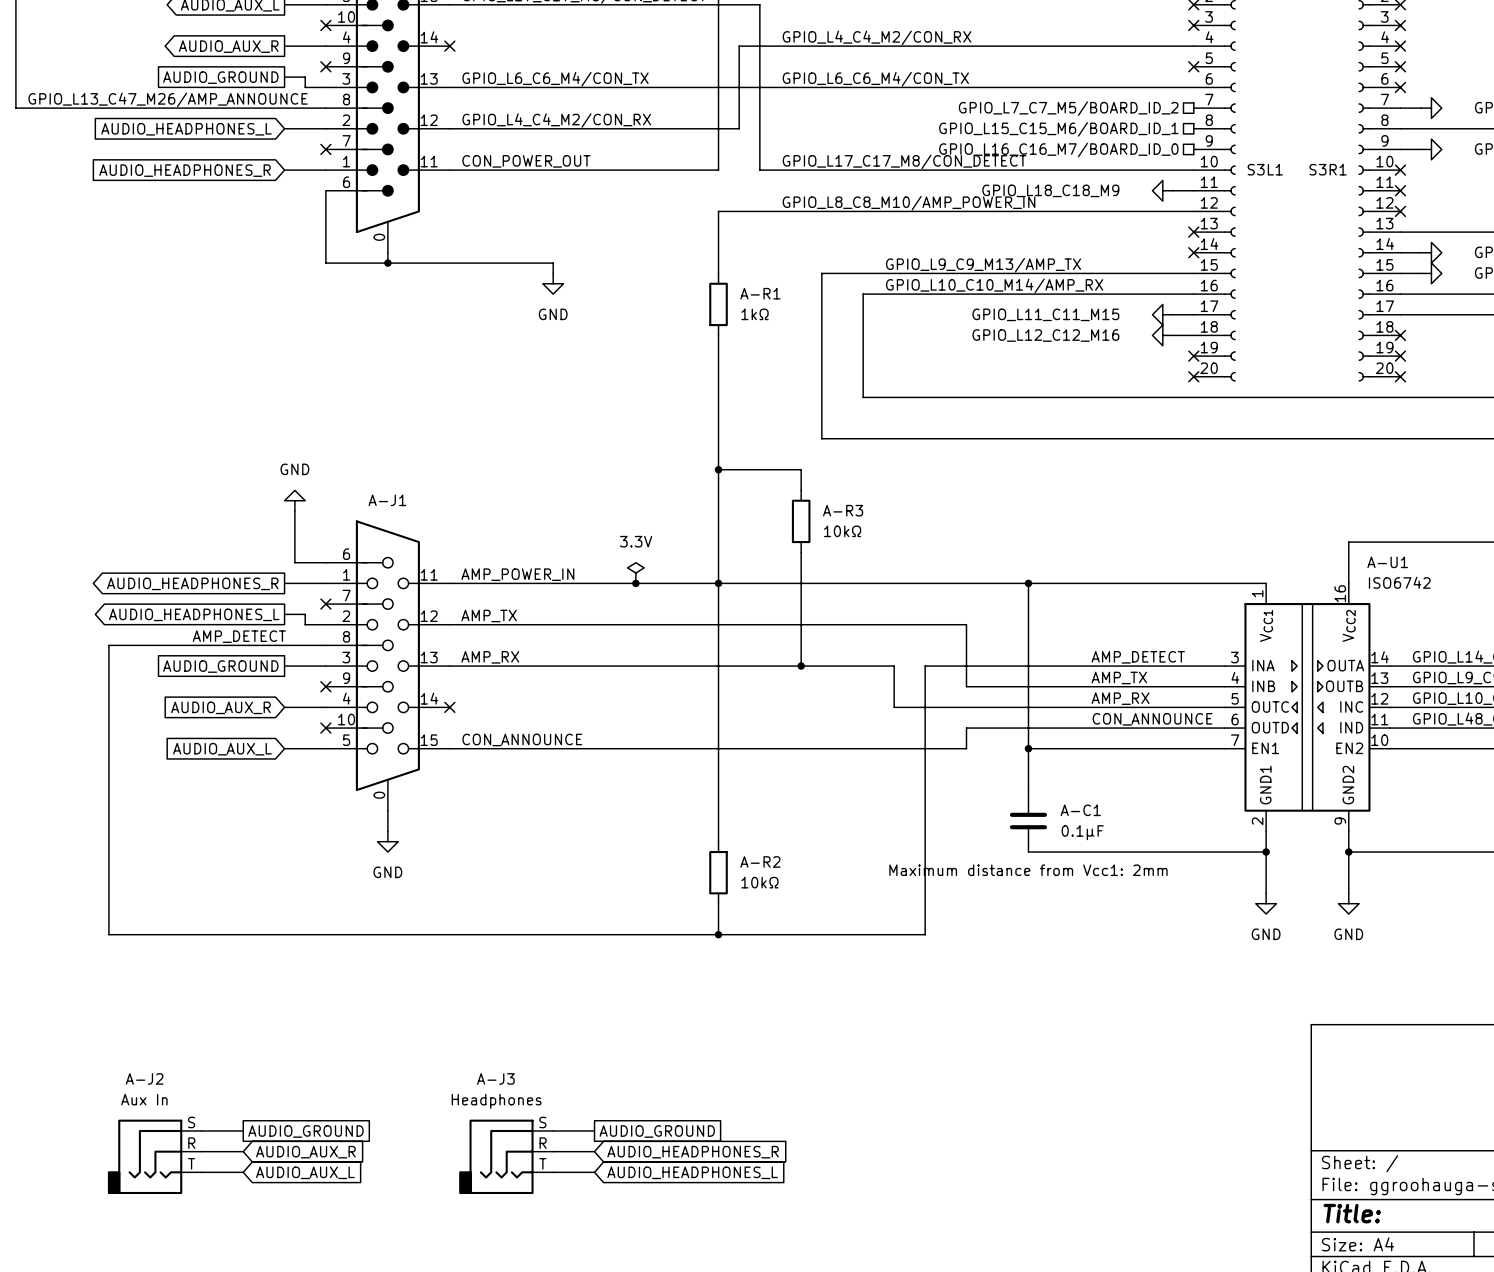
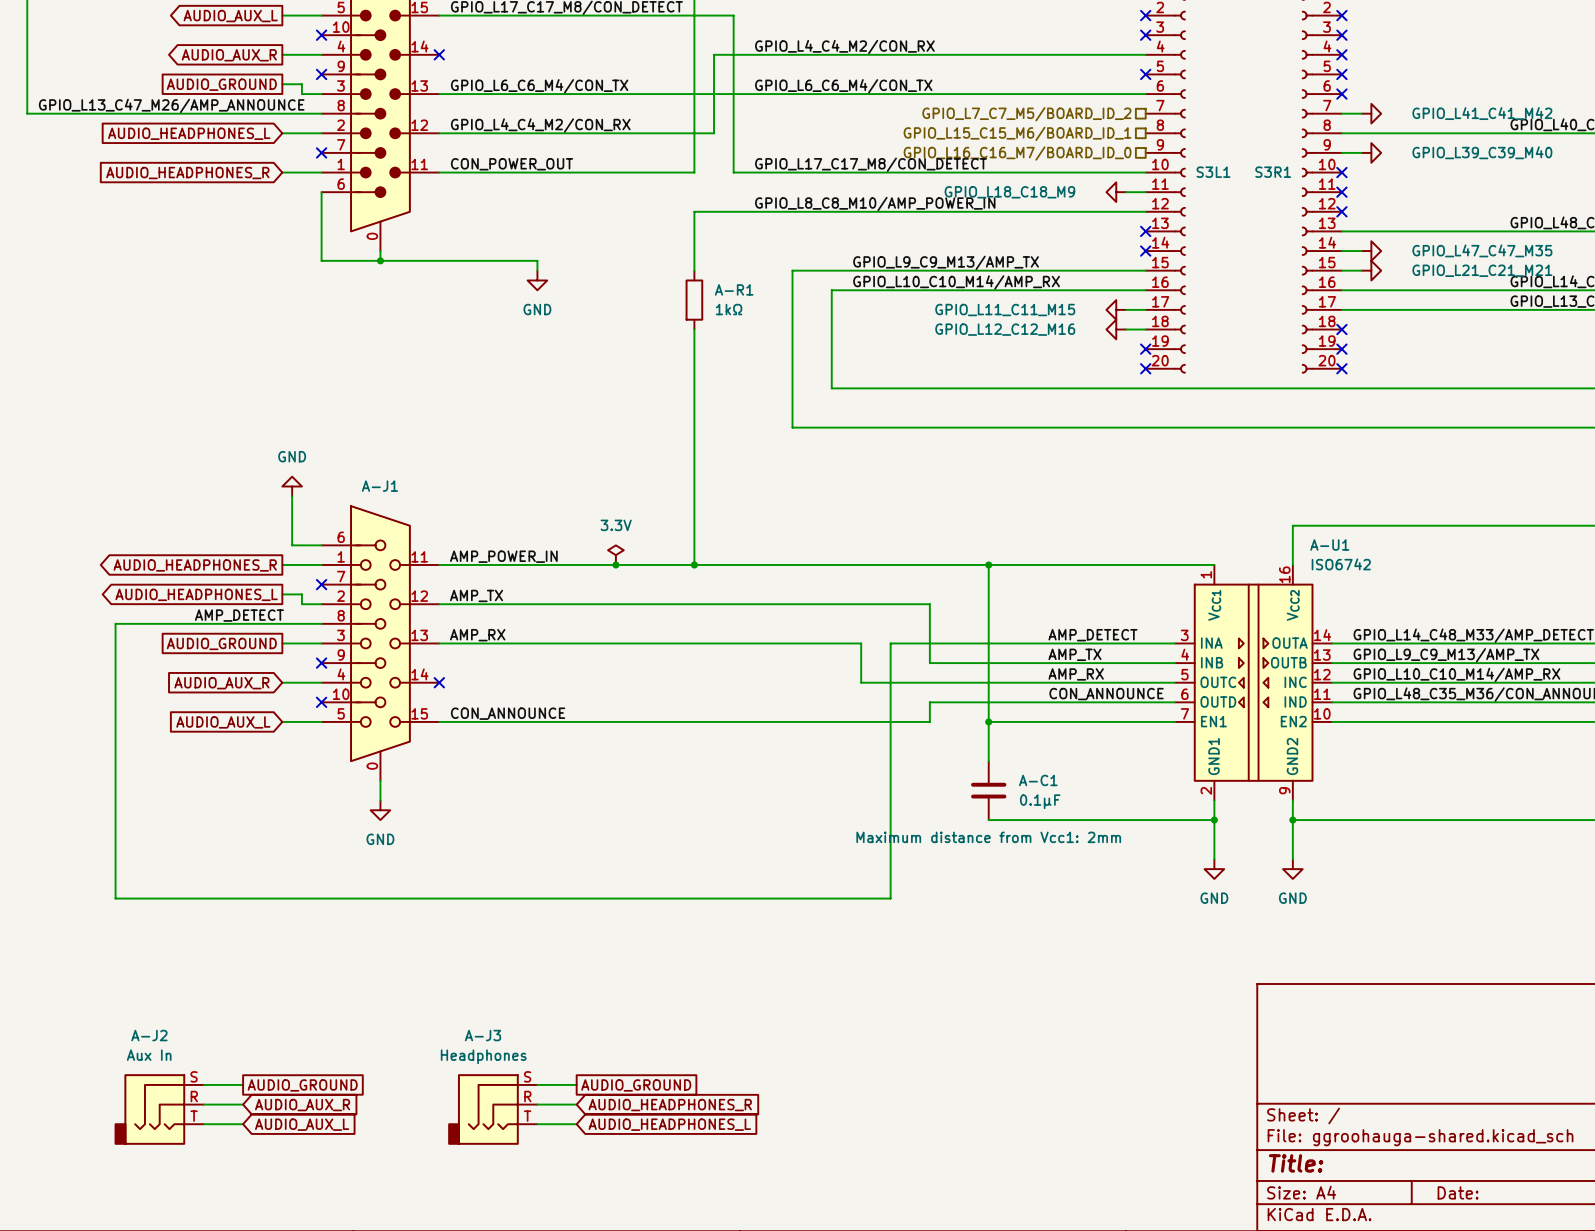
wire: (718, 469) (801, 469) (801, 490) -> none
junction: (718, 469) -> none
A-R3: 10kΩ (801, 521) -> none
wire: (801, 552) (801, 666) -> none
wire: (718, 583) (718, 841) -> none
junction: (801, 666) -> none
A-R2: 10kΩ (718, 872) -> none
wire: (718, 903) (718, 934) -> none
junction: (718, 934) -> none

